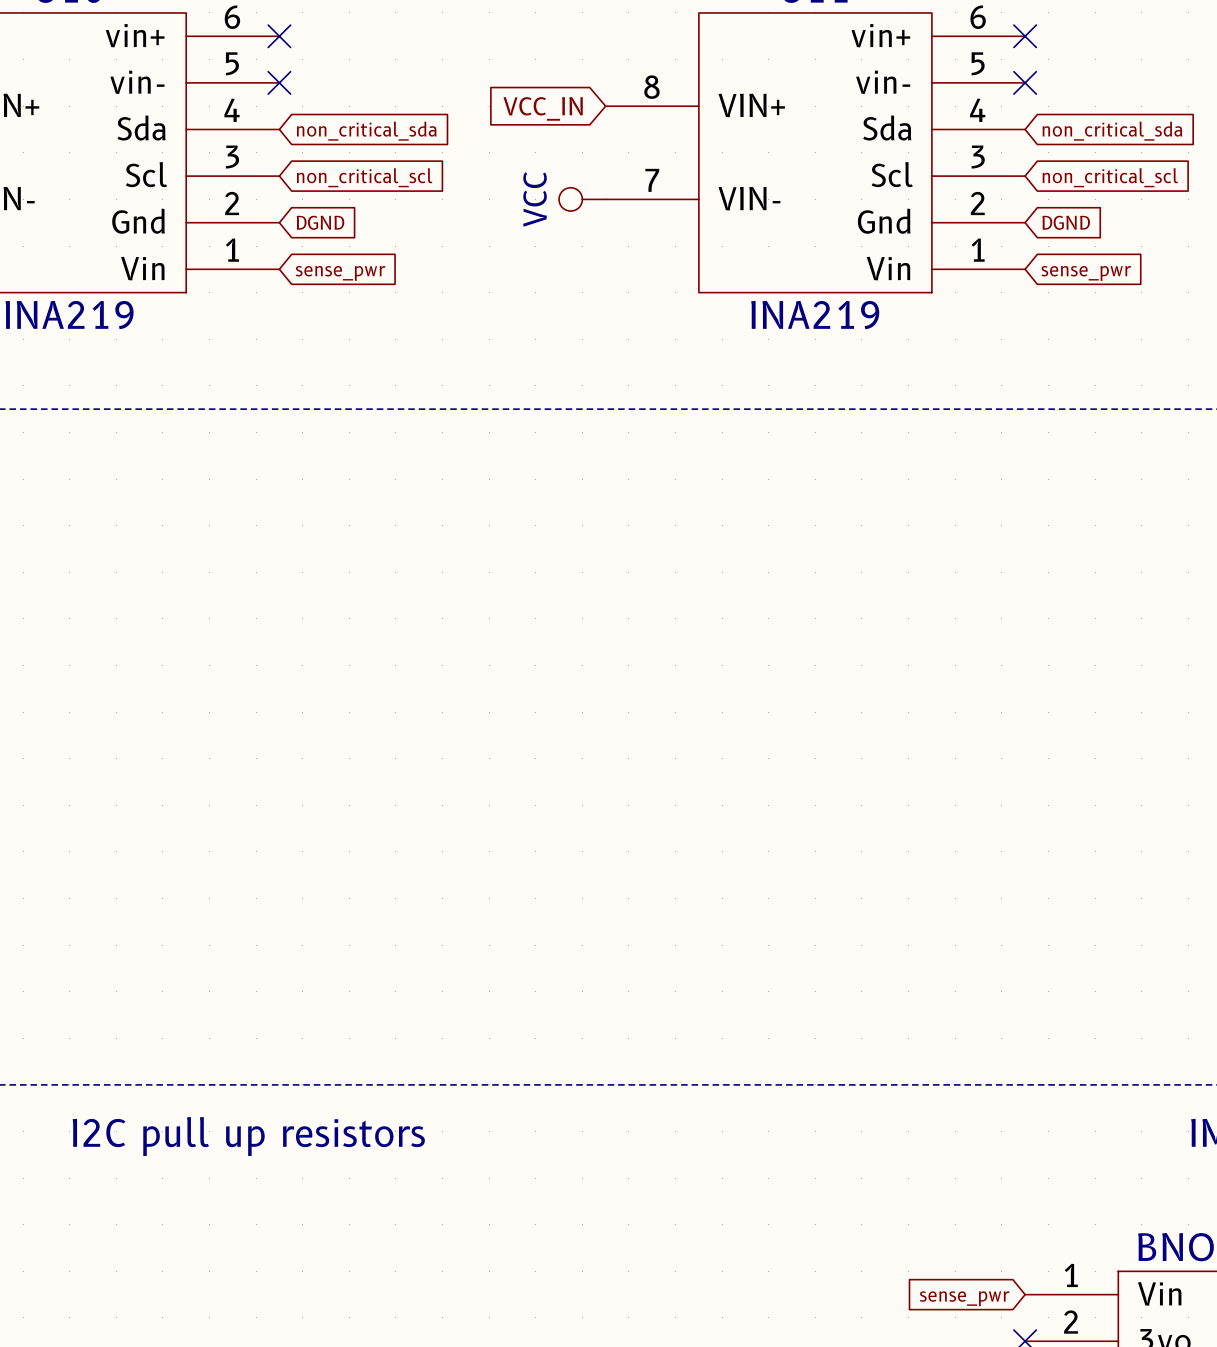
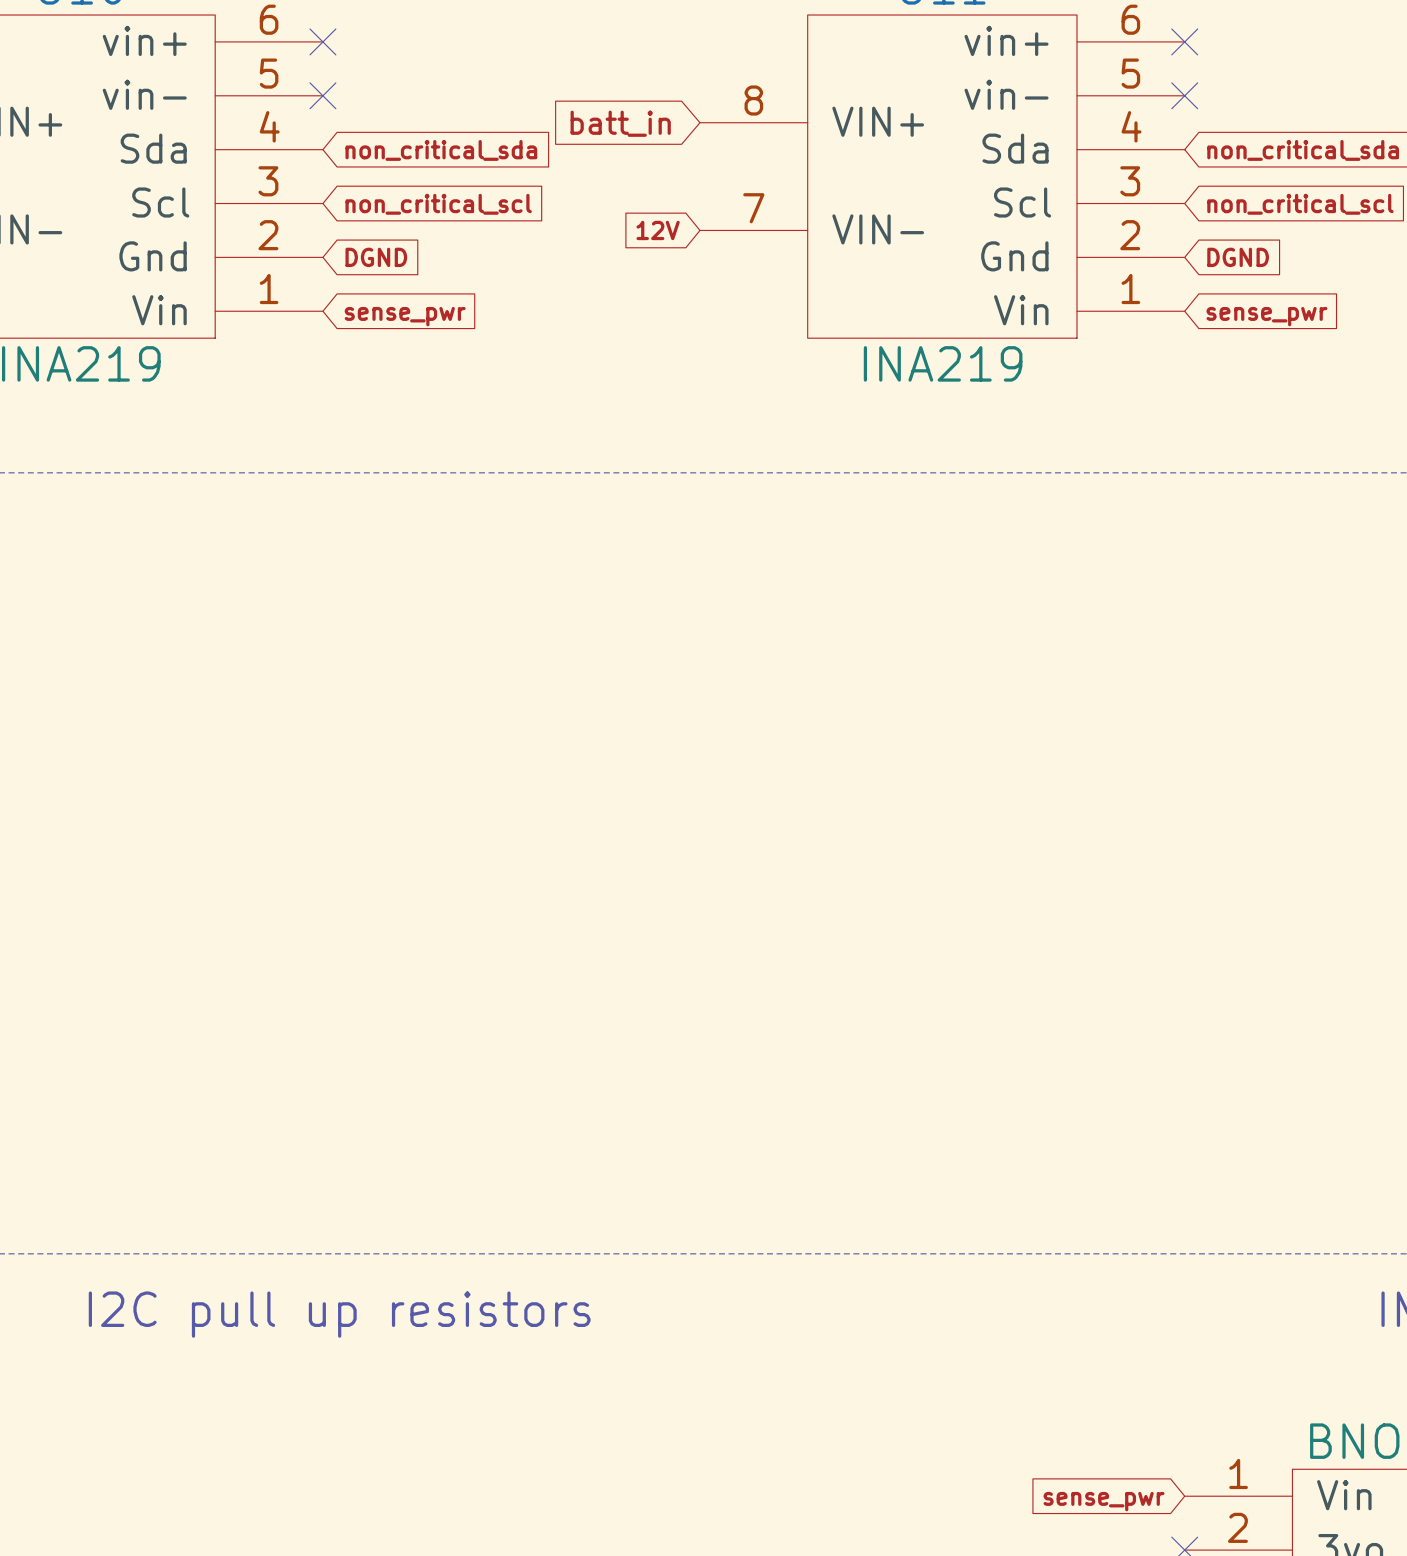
global label: VCC_IN (543, 108) -> batt_in (620, 123)
global label: none -> 12V (658, 230)
power symbol: VCC (582, 199) -> none

